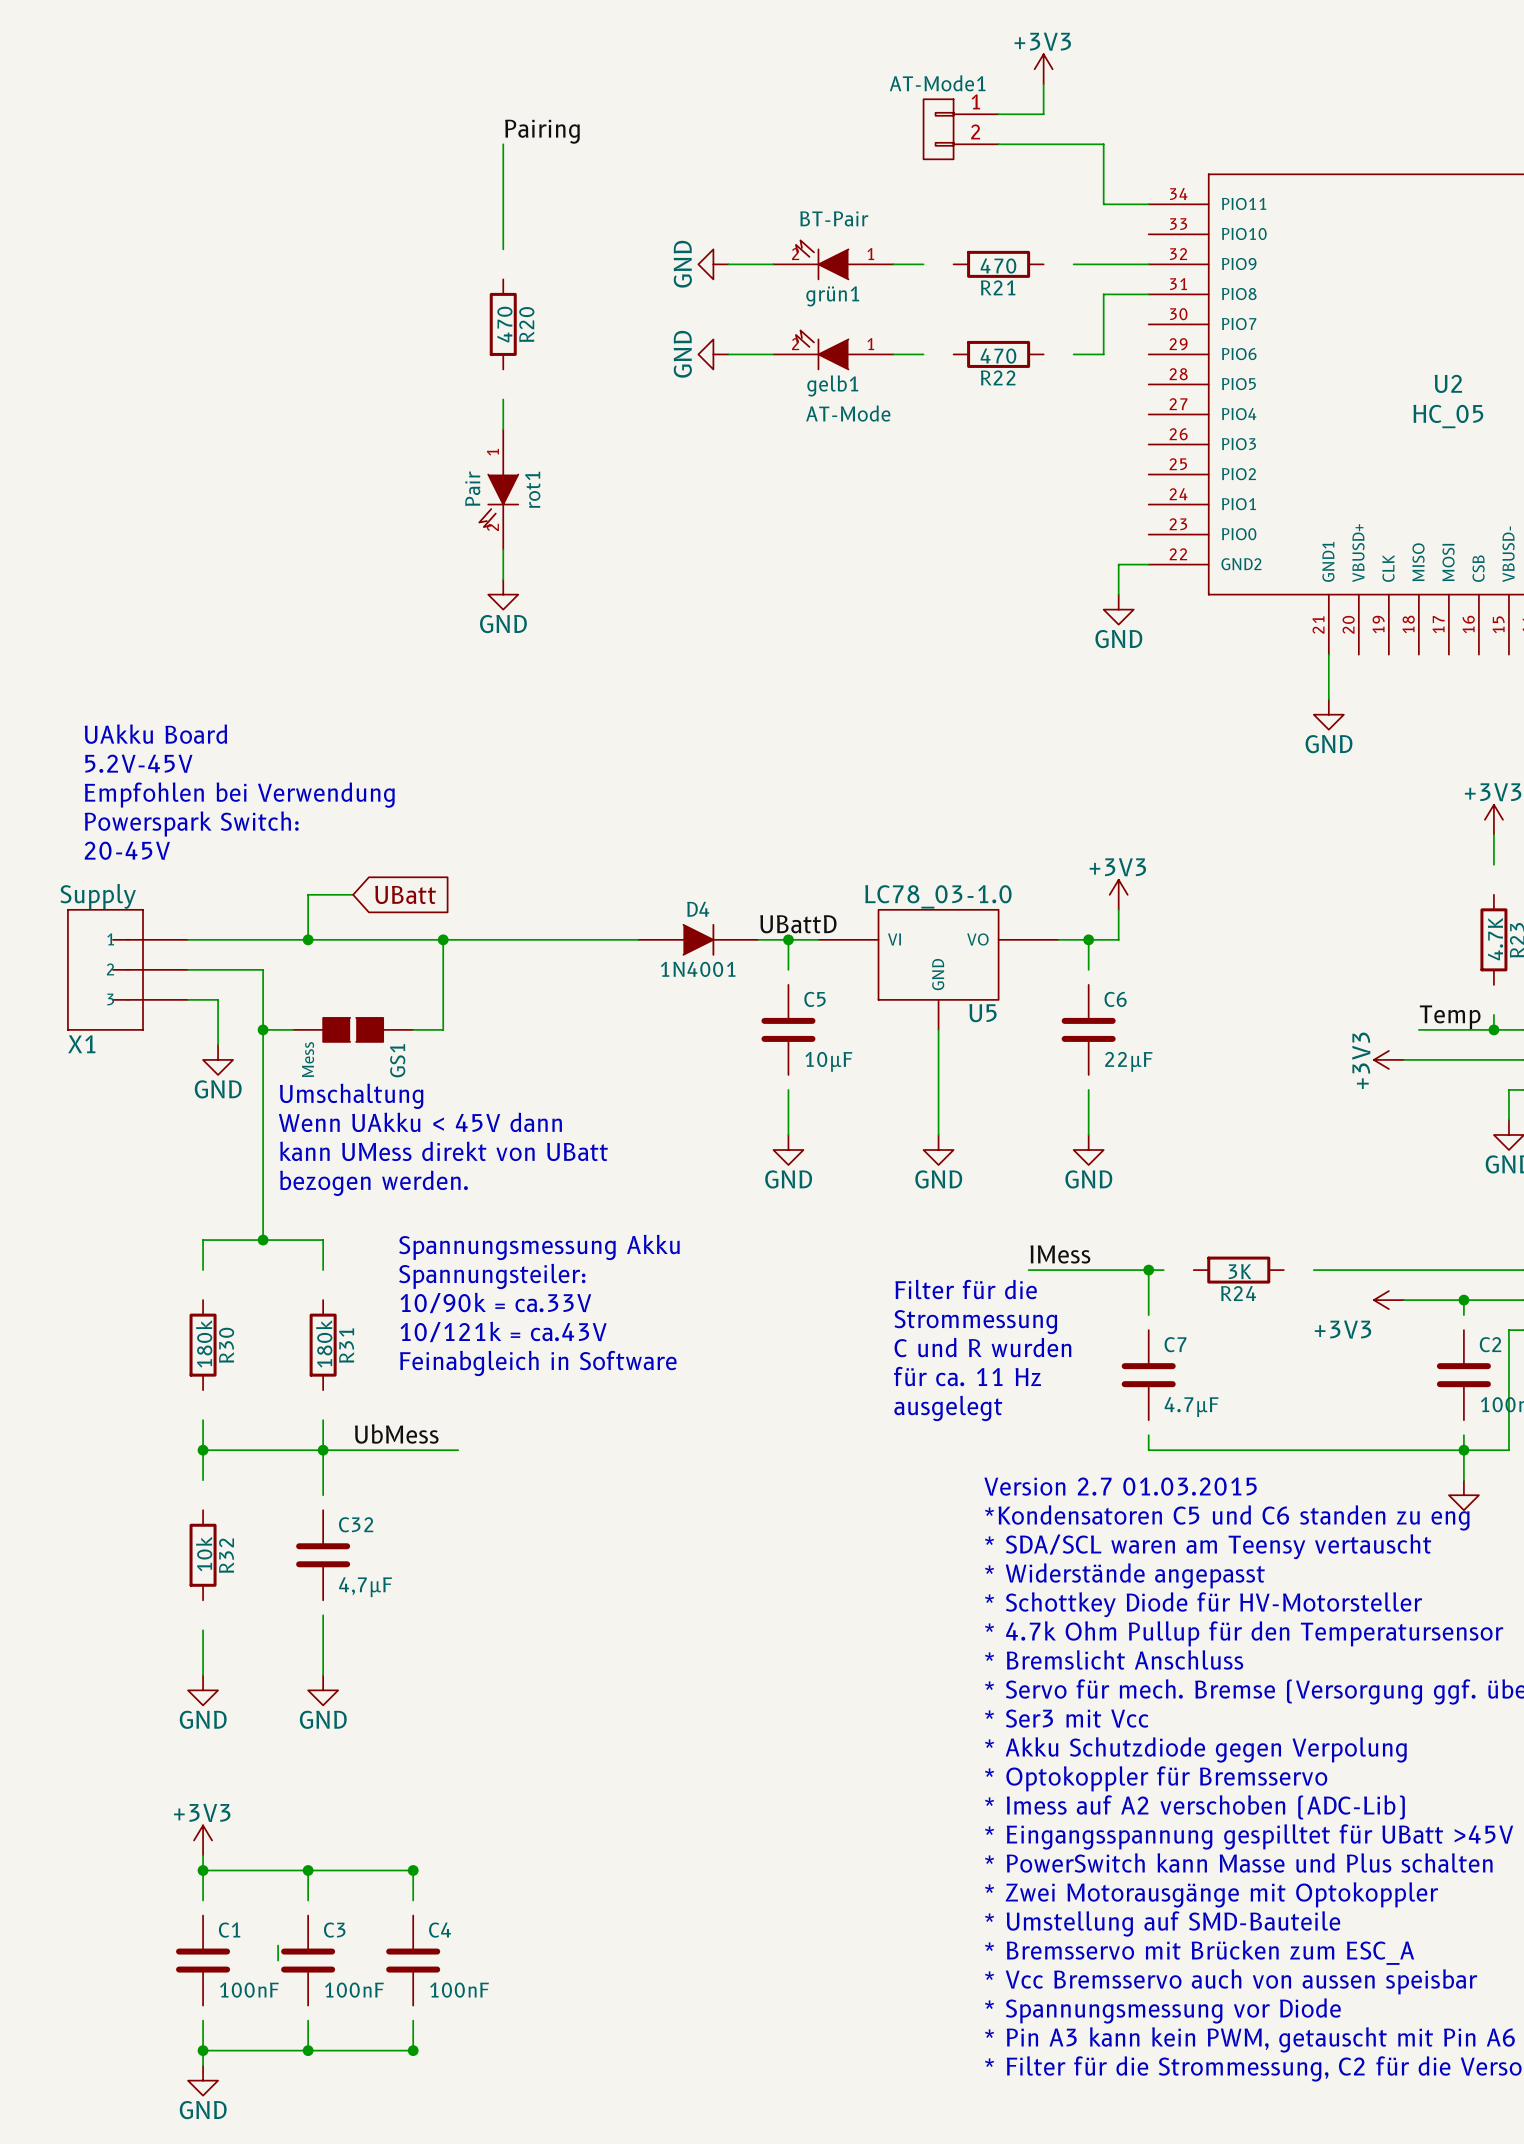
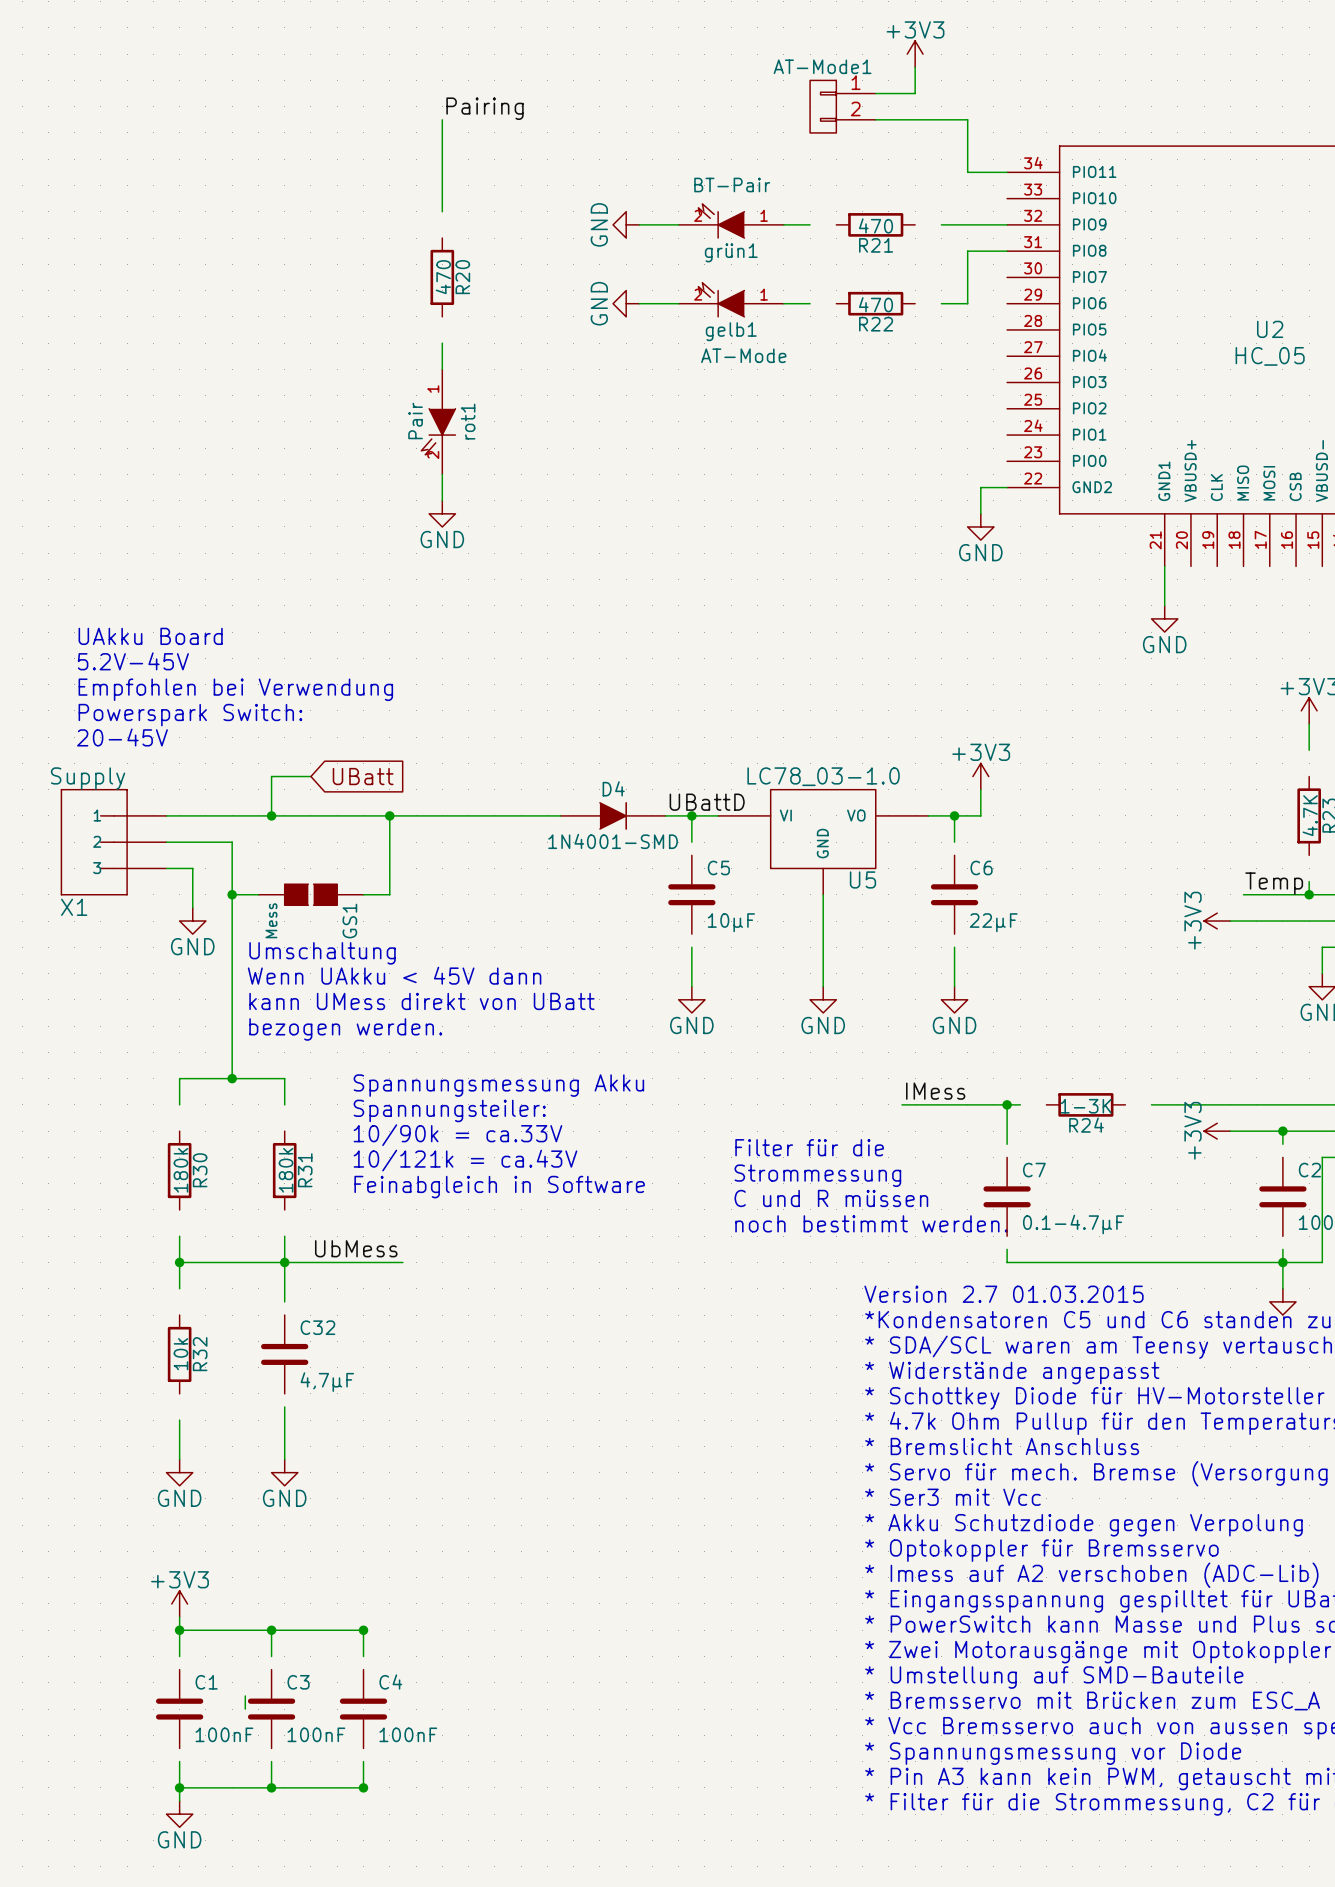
D4 value: 1N4001 (698, 969) -> 1N4001-SMD (613, 841)
R24 value: 3K (1240, 1271) -> 1-3K (1086, 1106)
text position: Filter für die (966, 1289) -> Filter für die (809, 1147)
text position: Strommessung (975, 1322) -> Strommessung (817, 1175)
power symbol text rotation: 0° (1343, 1329) -> 90° counterclockwise (1193, 1130)
text: C und R wurden (982, 1347) -> C und R müssen (831, 1198)
text: für ca. 11 Hz (967, 1376) -> none
text: none -> noch bestimmt werden. (871, 1223)
C7 value: 4.7µF (1191, 1407) -> 0.1-4.7µF (1073, 1224)
text: ausgelegt (948, 1408) -> none

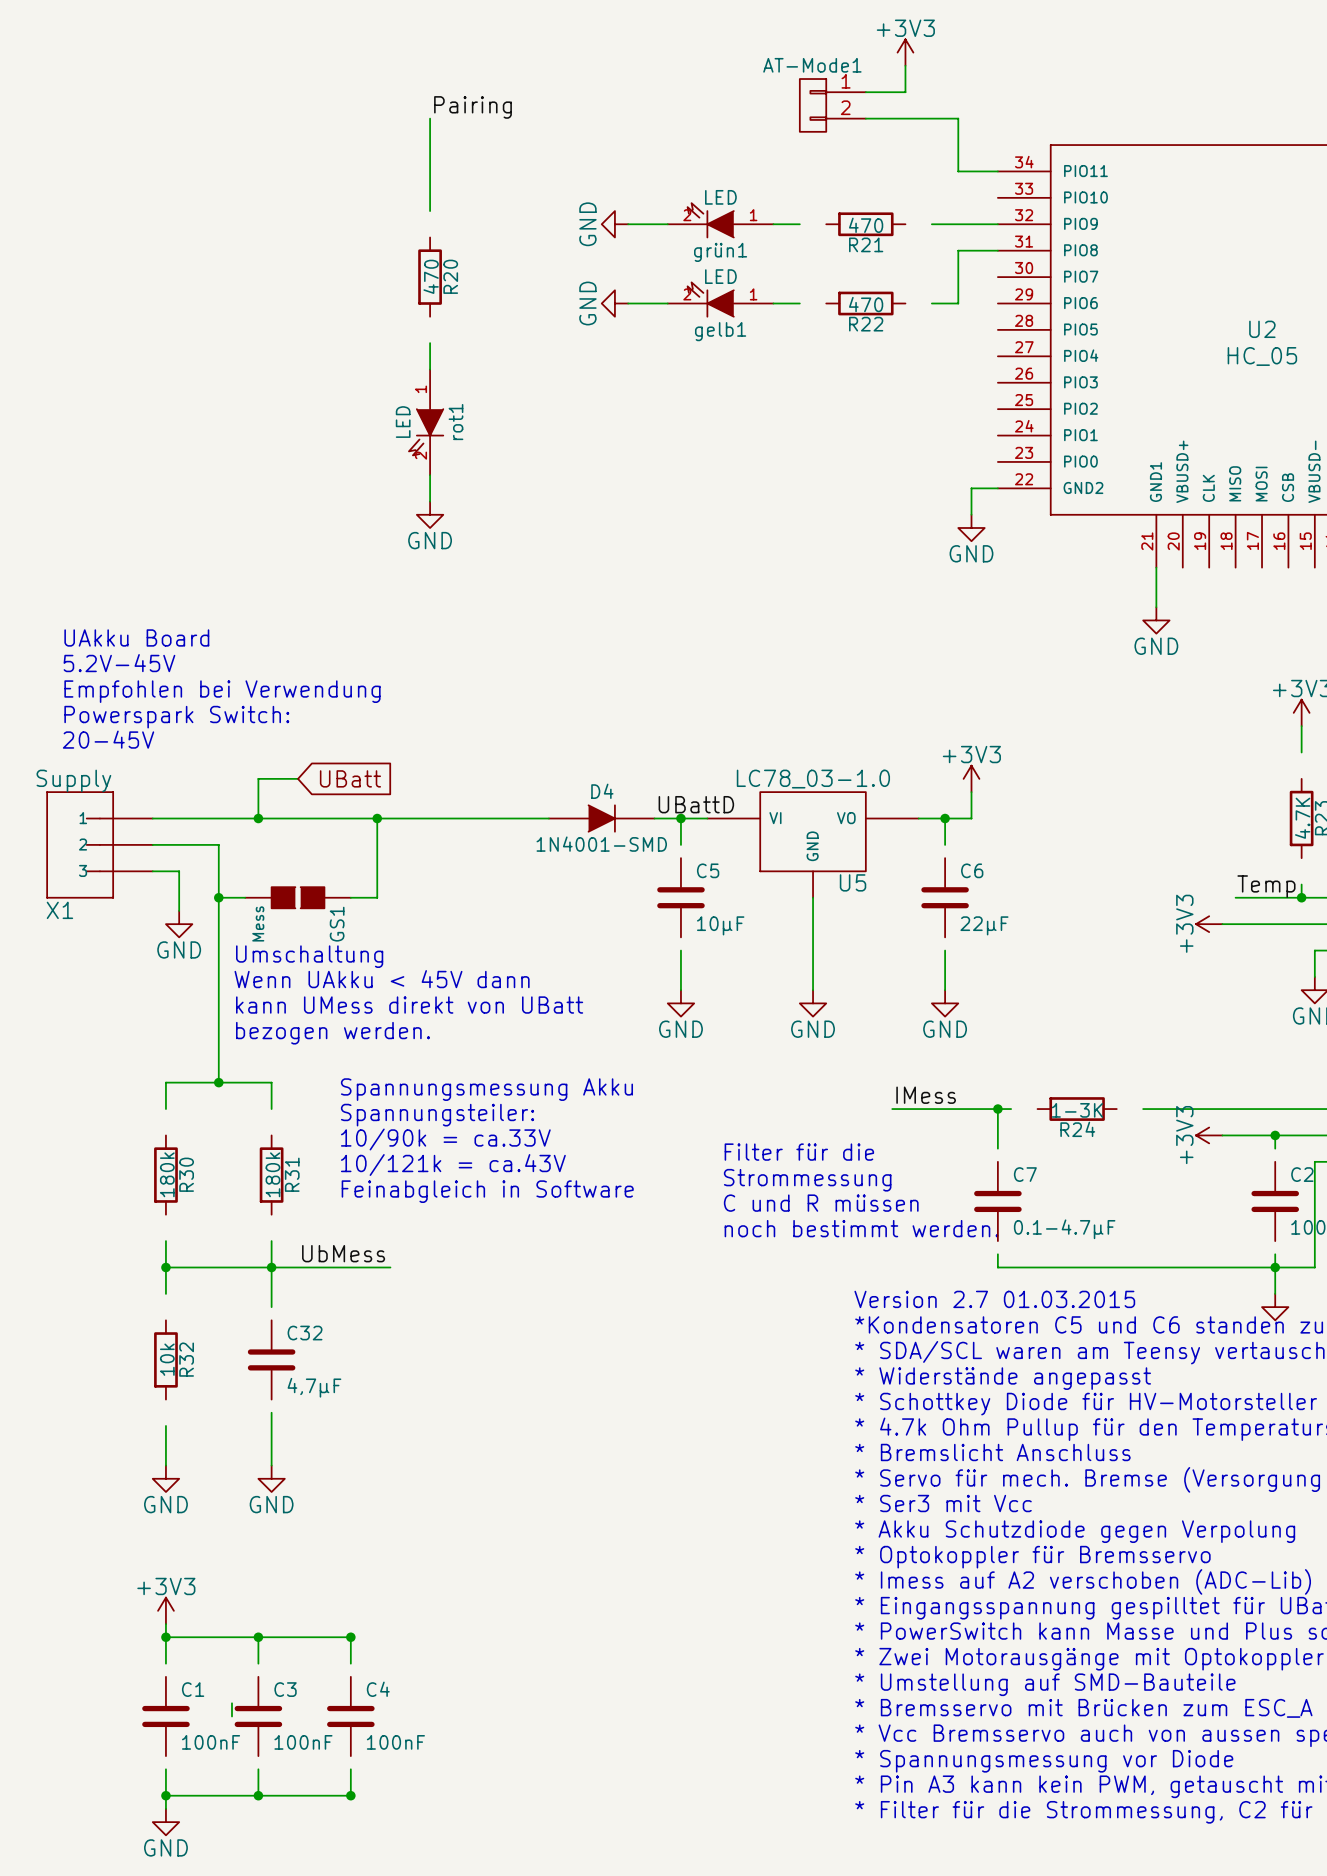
grün1 value: BT-Pair (732, 184) -> LED (720, 197)
gelb1 value: AT-Mode (743, 355) -> LED (720, 276)
rot1 value: Pair (415, 420) -> LED (403, 422)

